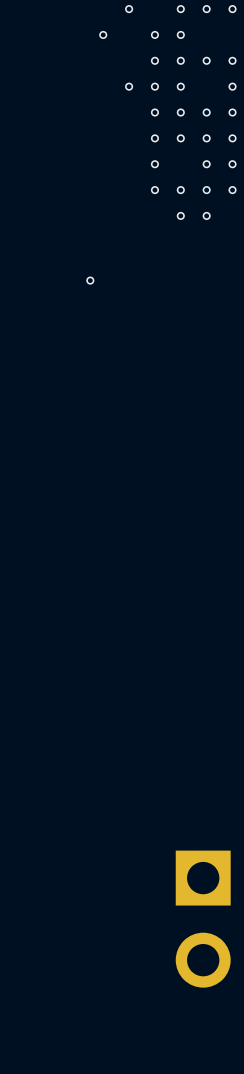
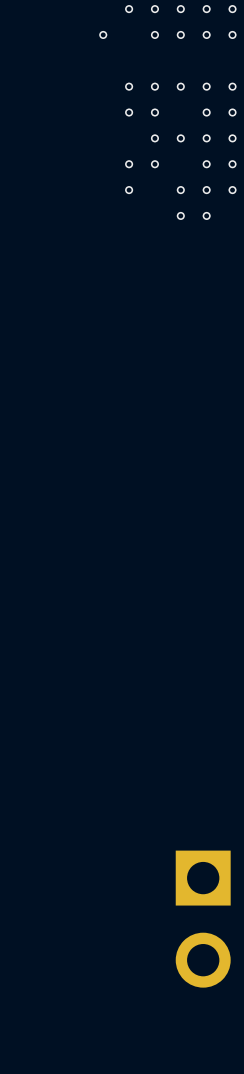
via: none -> (154, 9)
via: none -> (206, 34)
via: none -> (232, 34)
via: (154, 60) -> none
via: (180, 60) -> none
via: (206, 60) -> none
via: (232, 60) -> none
via: none -> (206, 86)
via: none -> (129, 112)
via: (180, 112) -> none
via: none -> (129, 164)
via: none -> (129, 190)
via: (154, 190) -> none
via: (90, 280) -> none

